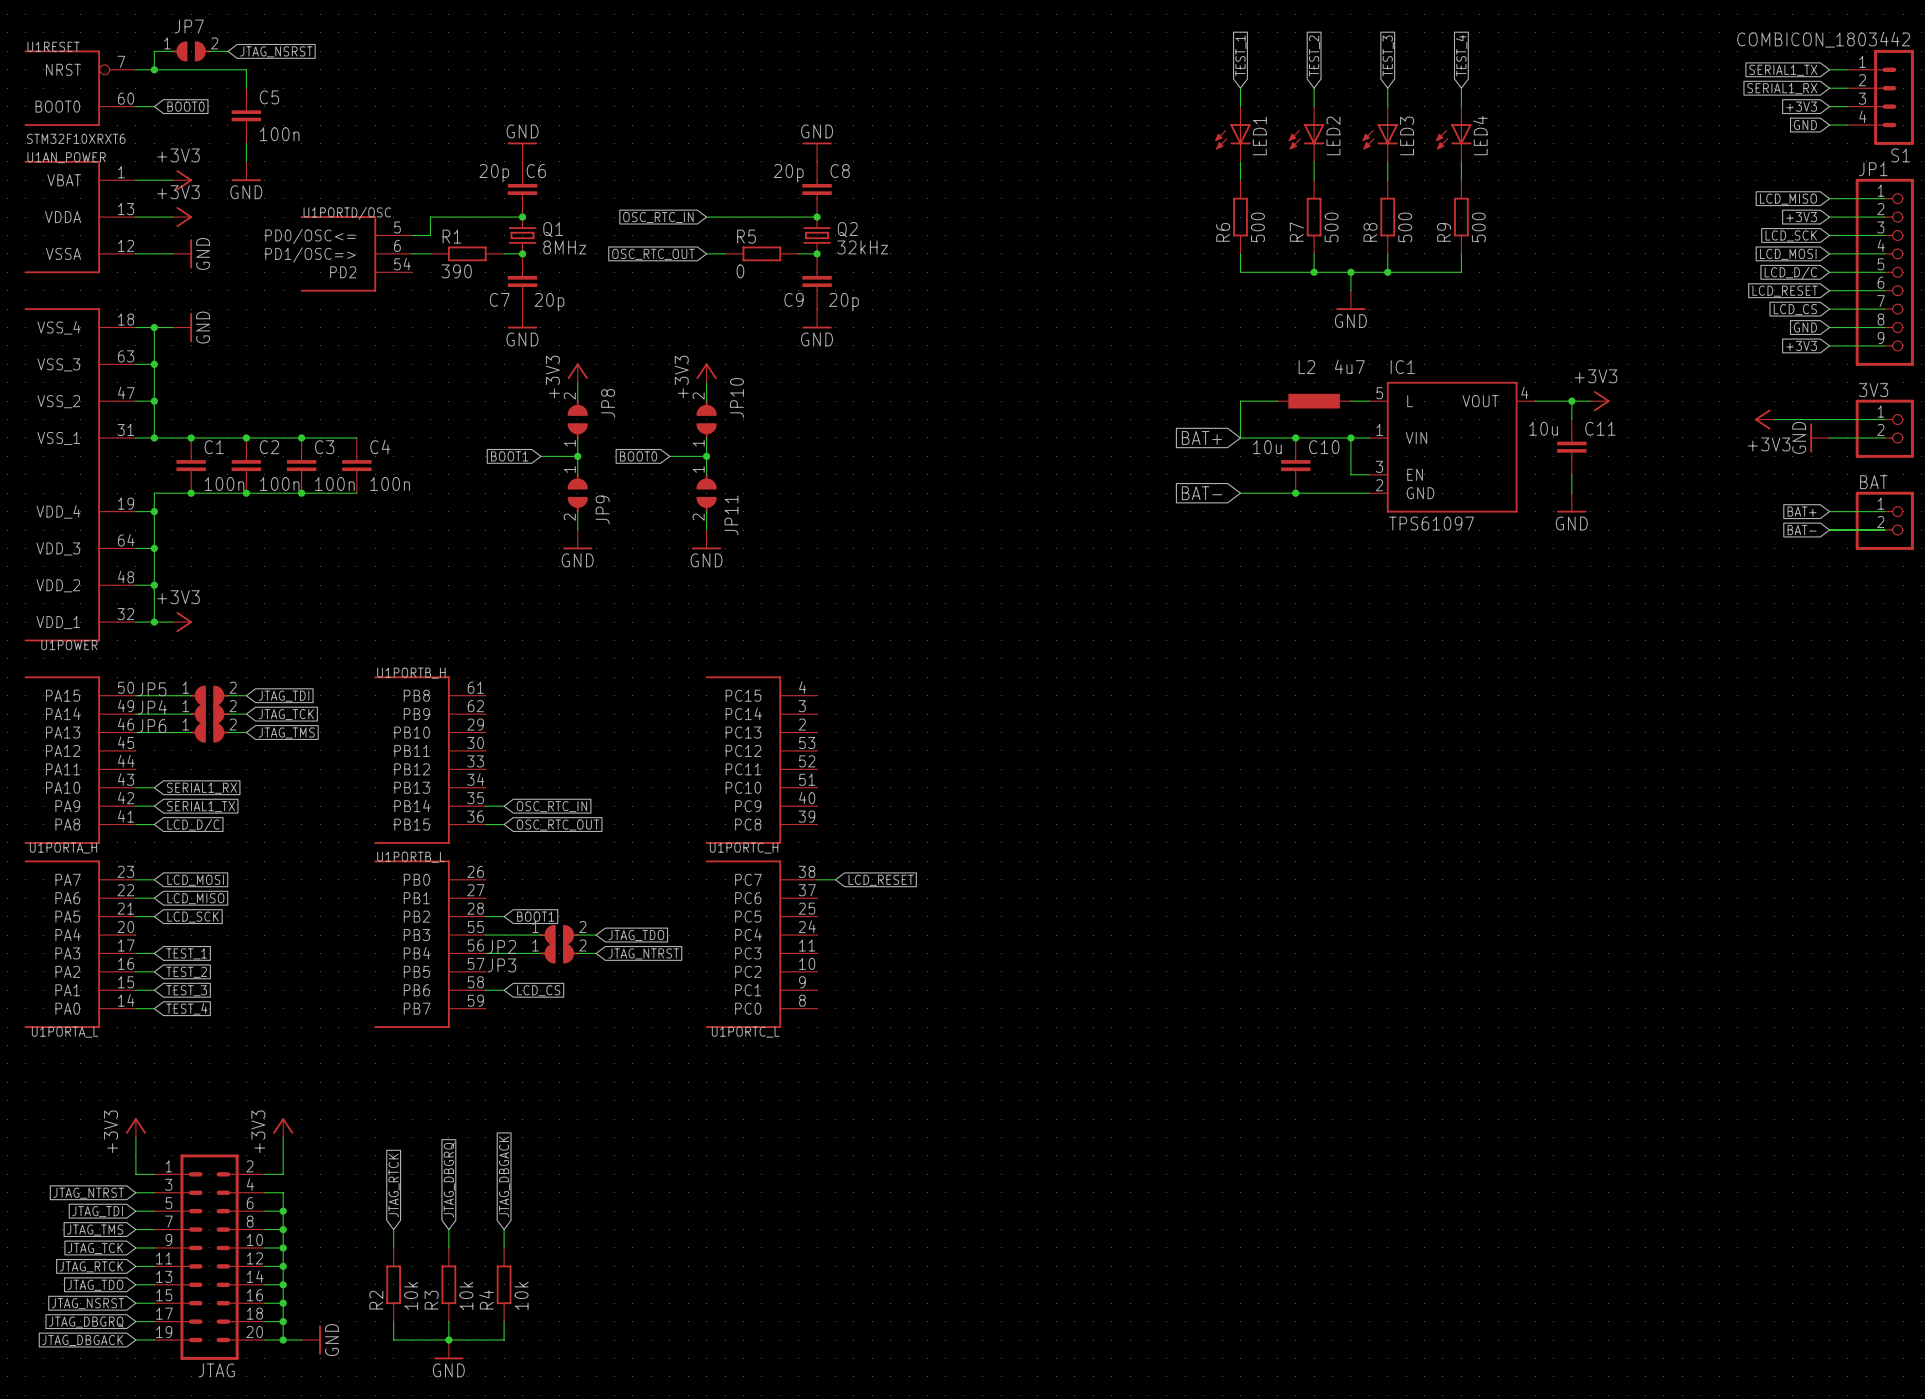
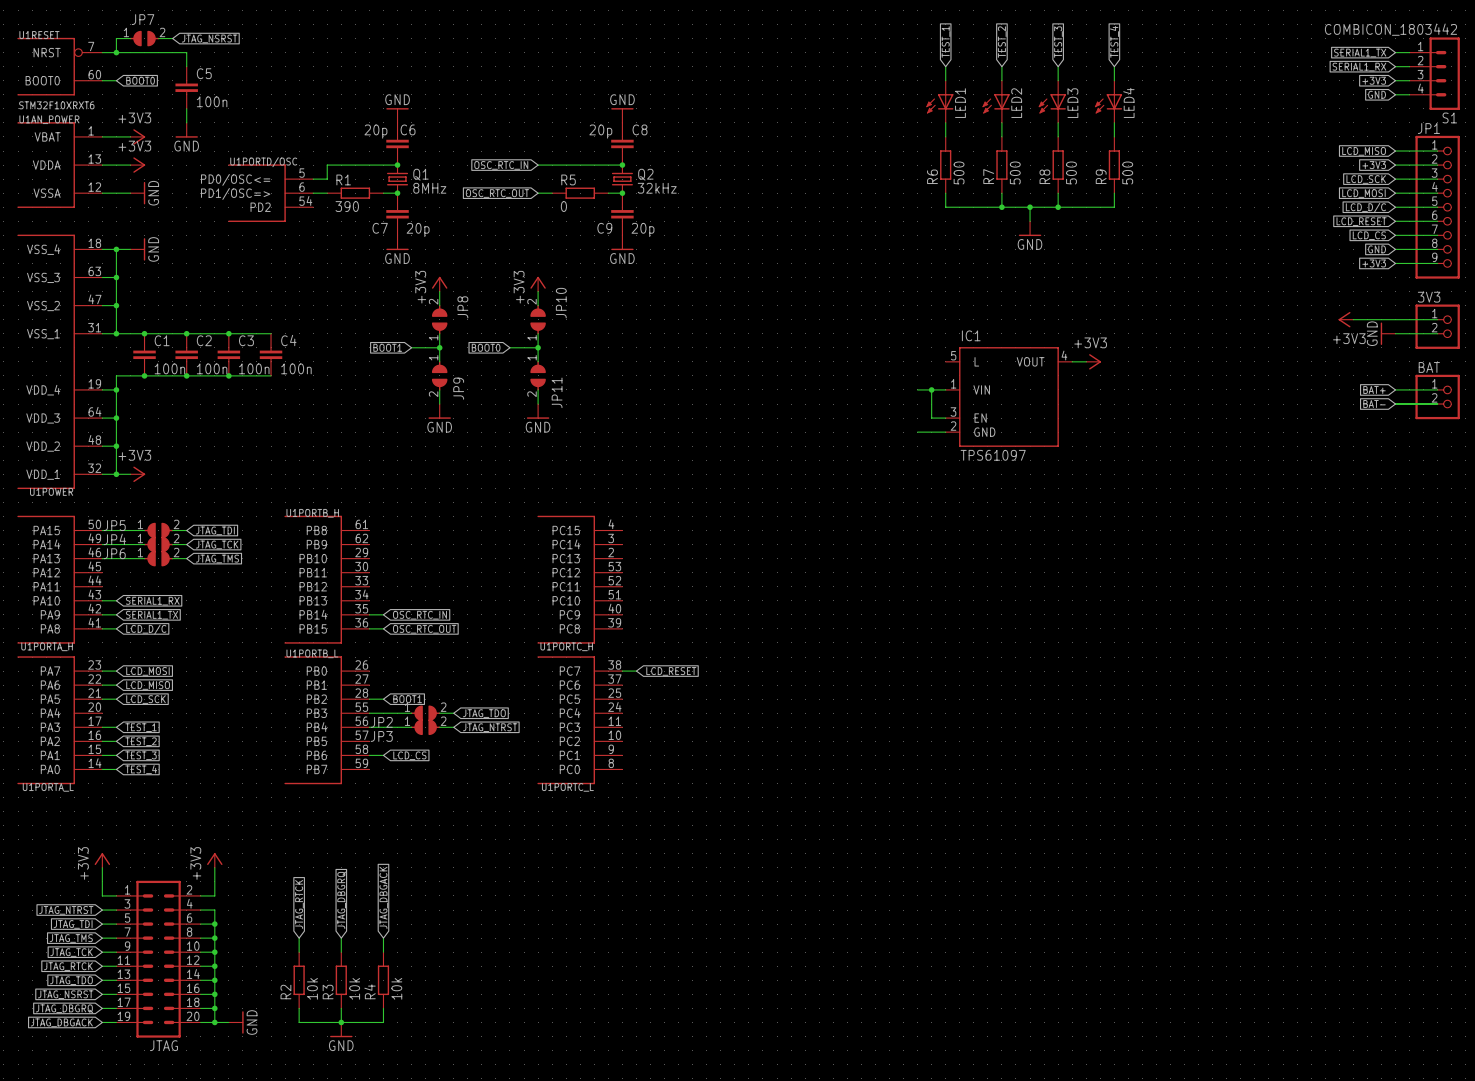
wire: (1277, 401) (1240, 401) (1240, 437) (1369, 437) -> none
L2: 4u7 (1314, 401) -> none
wire: (1350, 401) (1369, 401) -> (1072, 361) (1086, 361)
wire: (1535, 401) (1590, 401) -> none
wire: (1571, 401) (1571, 419) -> none
junction: (1571, 401) -> none
power symbol: +3V3 (1599, 401) -> none
global label: BAT+ (1201, 437) -> none
junction: (1295, 437) -> none
wire: (1350, 437) (1350, 474) (1369, 474) -> (931, 389) (931, 418) (945, 418)
junction: (1350, 437) -> none
IC1 position: (1452, 447) -> (1008, 396)
C11: 10u (1571, 447) -> none
C10: 10u (1295, 465) -> none
power symbol: none -> +3V3 (1093, 361)
wire: (1571, 474) (1571, 493) -> none
global label: BAT- (1201, 493) -> none
wire: (1240, 493) (1369, 493) -> none
junction: (1295, 493) -> none
power symbol: GND (1571, 502) -> none
wire: none -> (917, 389) (945, 389)
junction: none -> (931, 389)
wire: none -> (917, 432) (945, 432)

